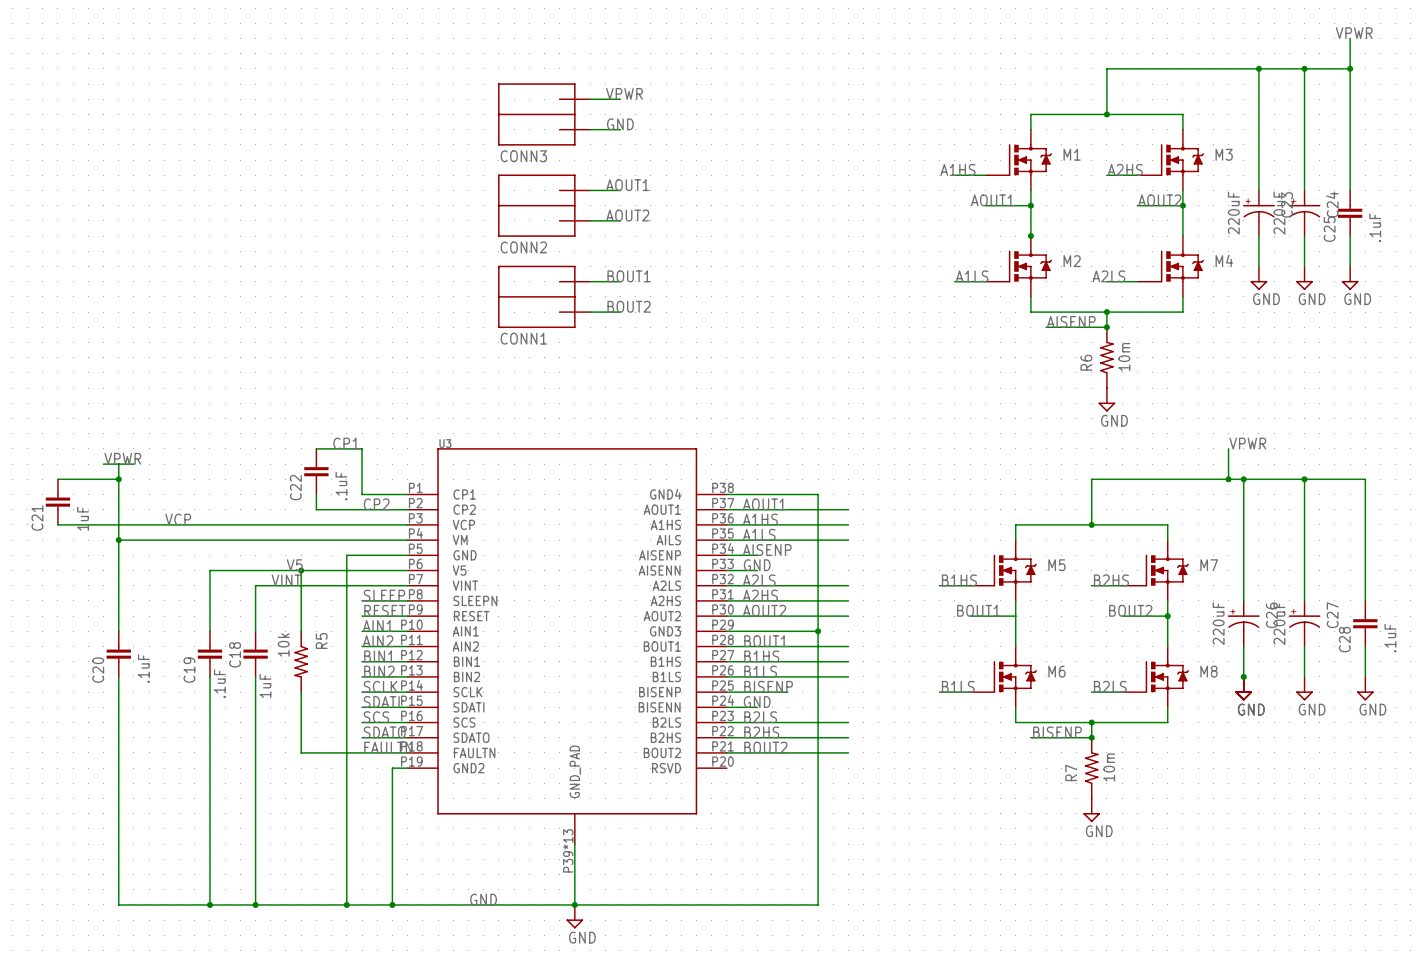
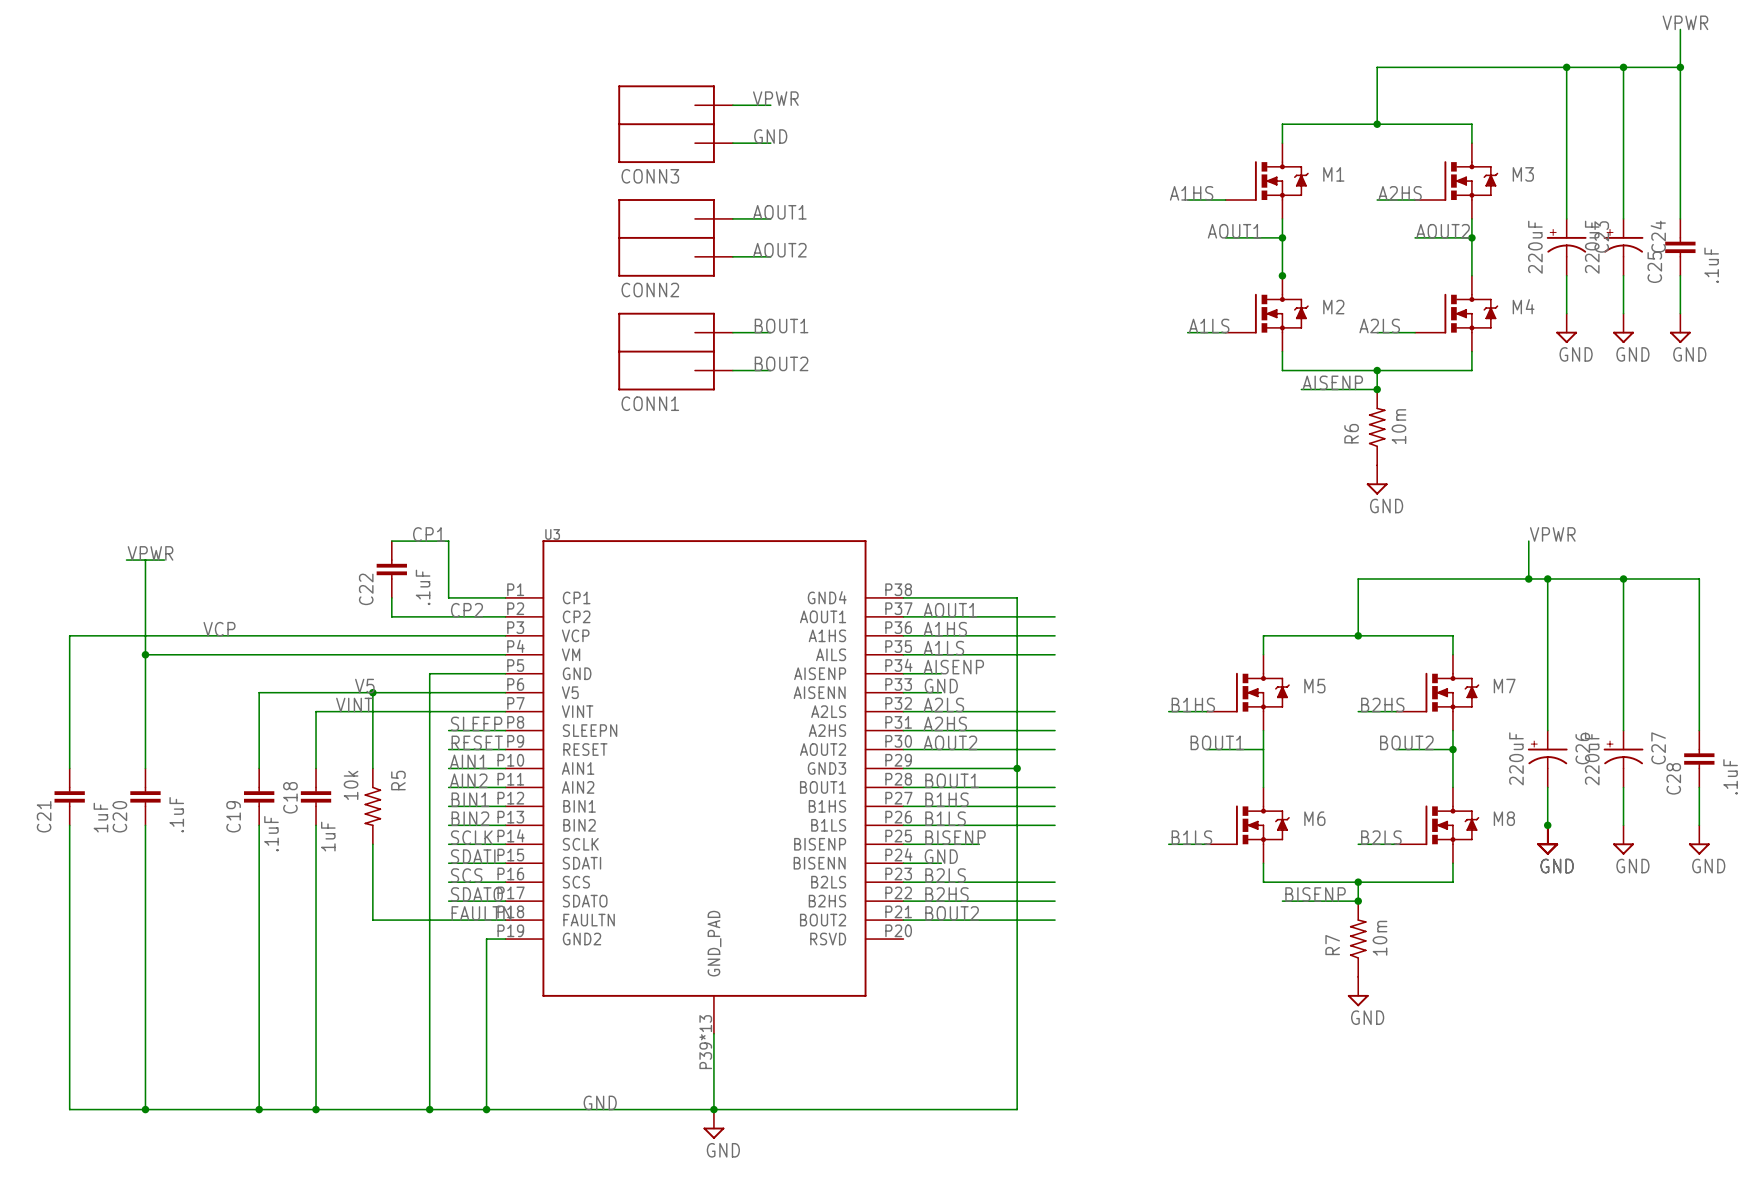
wire: (57, 479) (118, 479) -> none
junction: (118, 479) -> none
C21 position: (57, 502) -> (69, 796)
wire: none -> (69, 635) (69, 768)
wire: none -> (69, 825) (69, 1109) (145, 1109)
junction: none -> (145, 1109)

